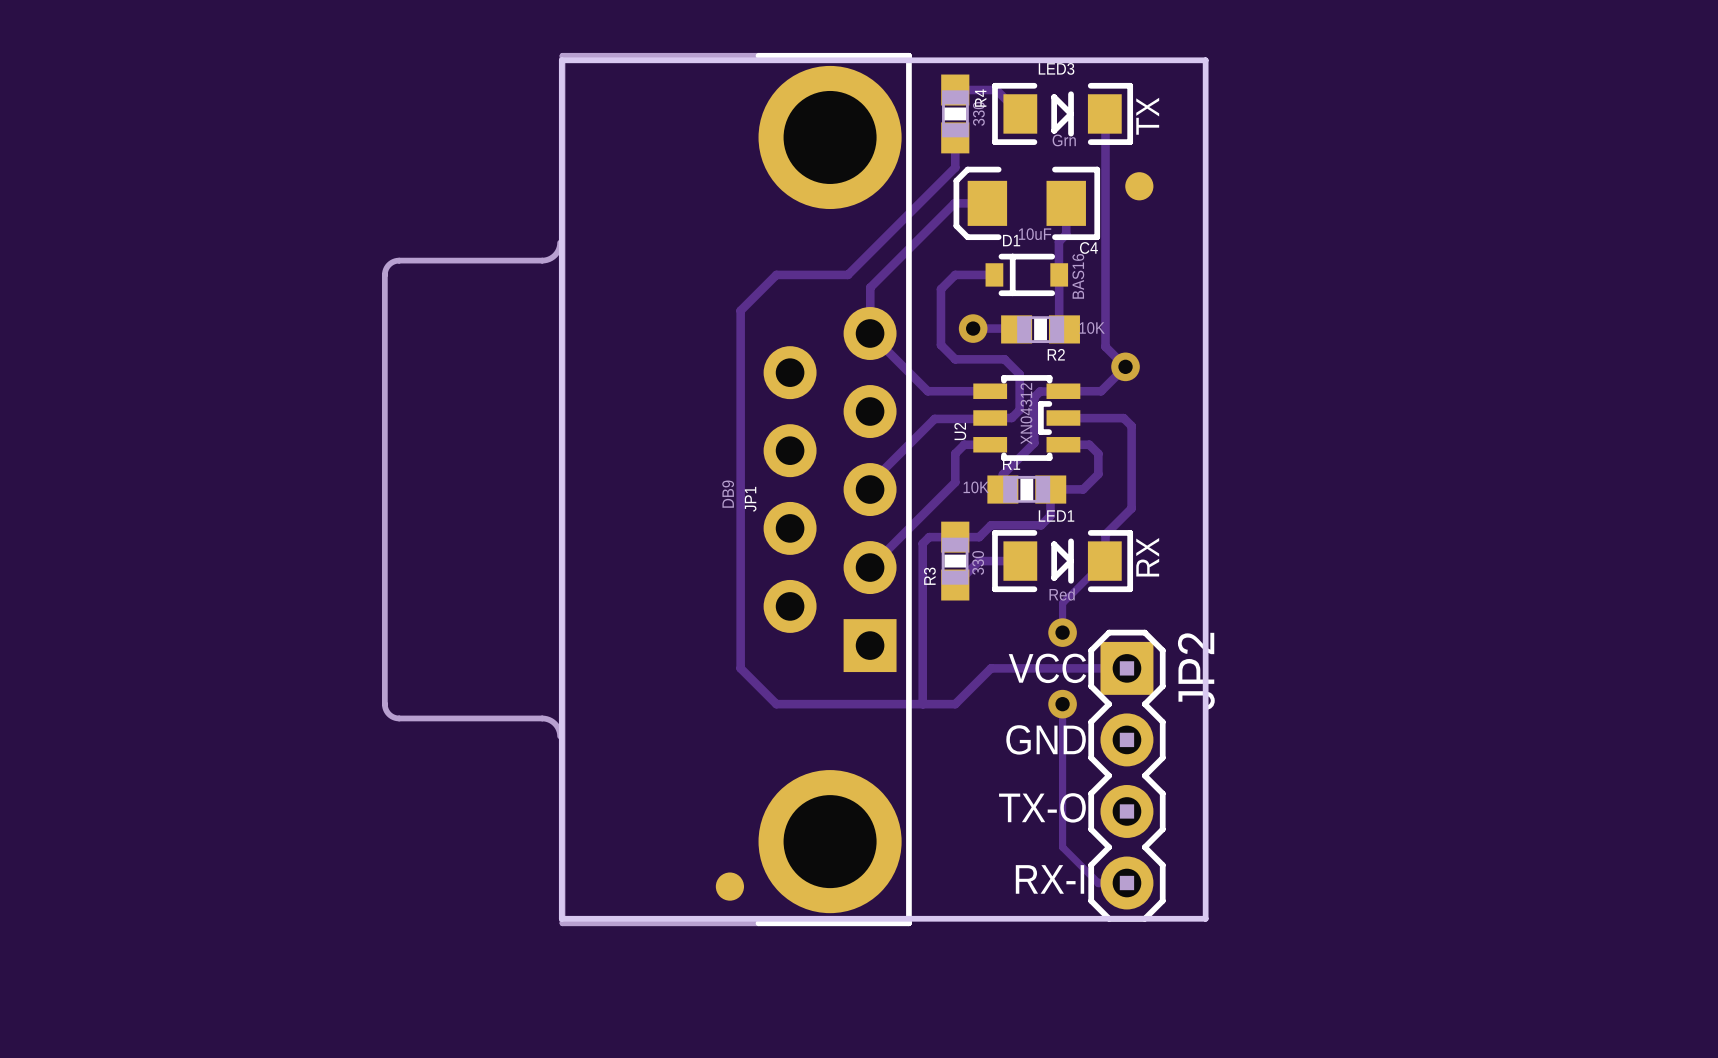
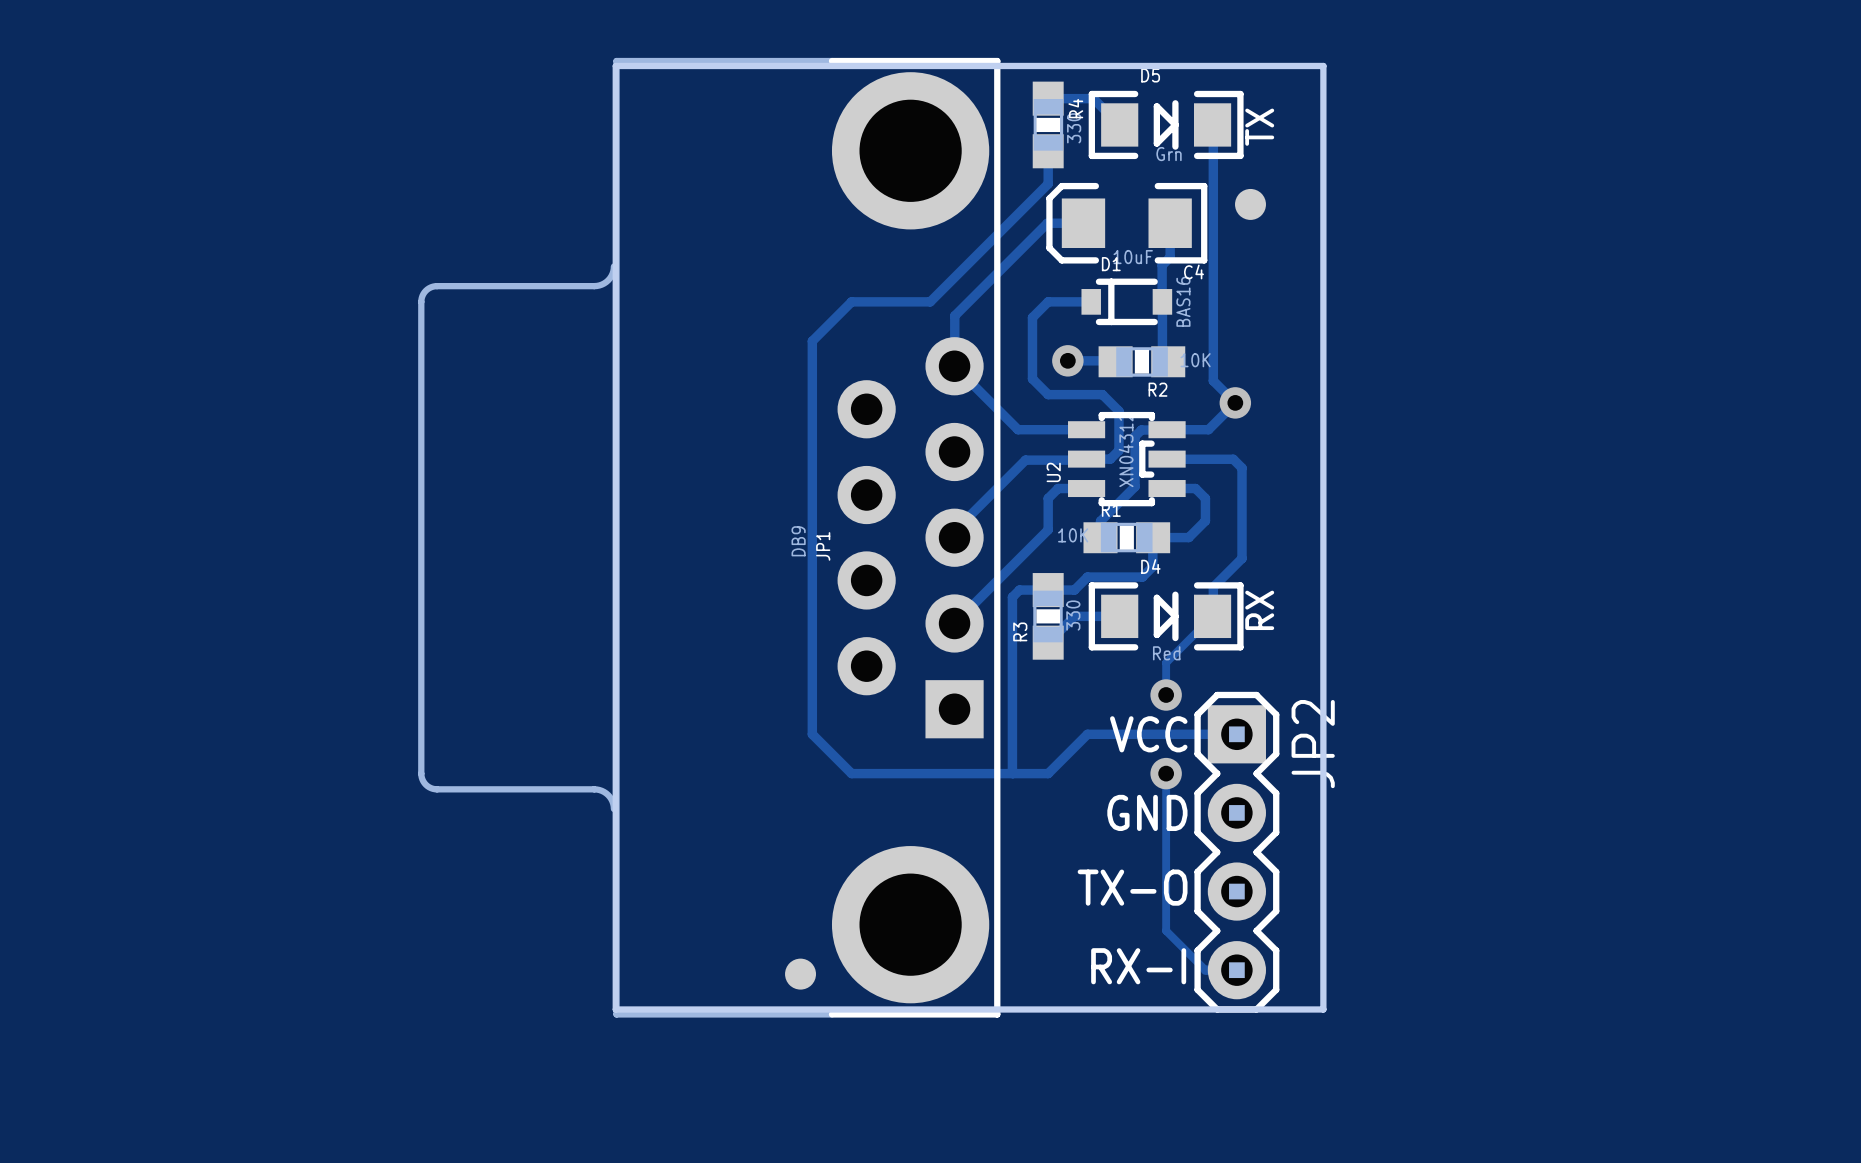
LED3 name: LED3 (1056, 68) -> D5 (1150, 75)
LED1 name: LED1 (1056, 516) -> D4 (1150, 566)

